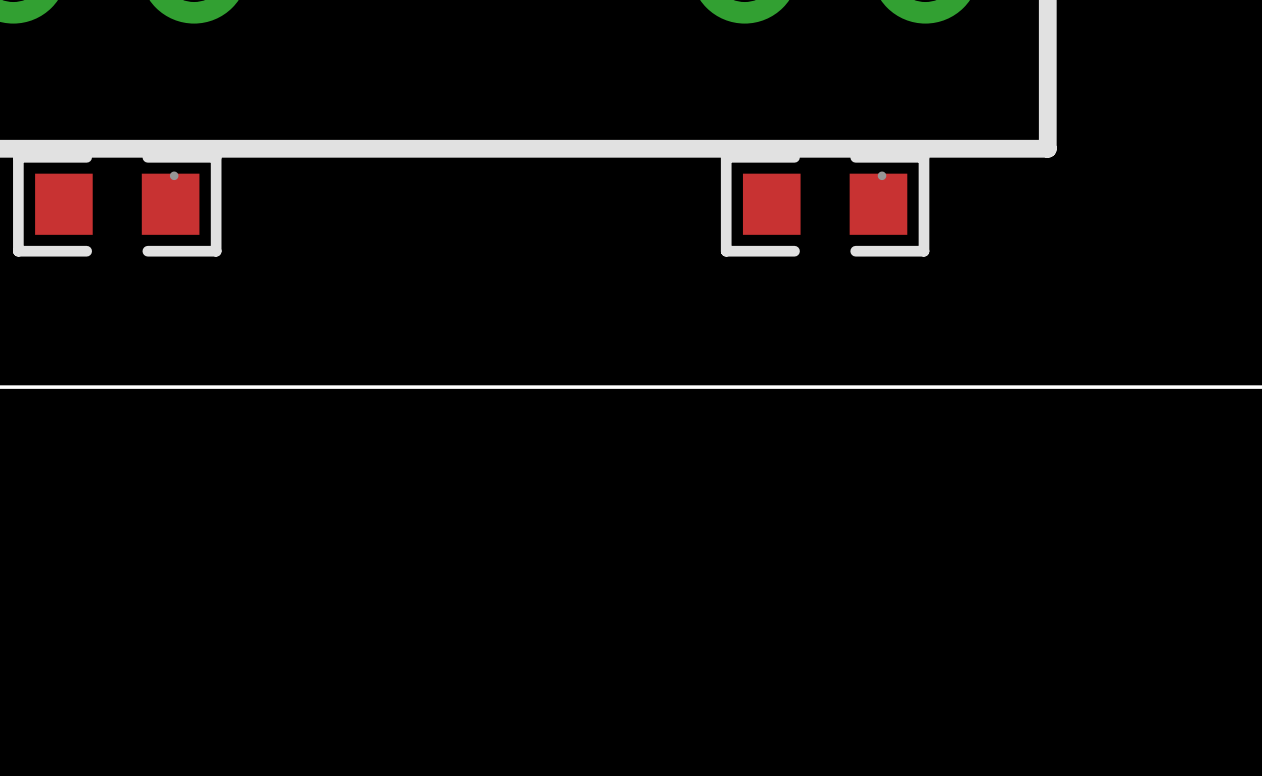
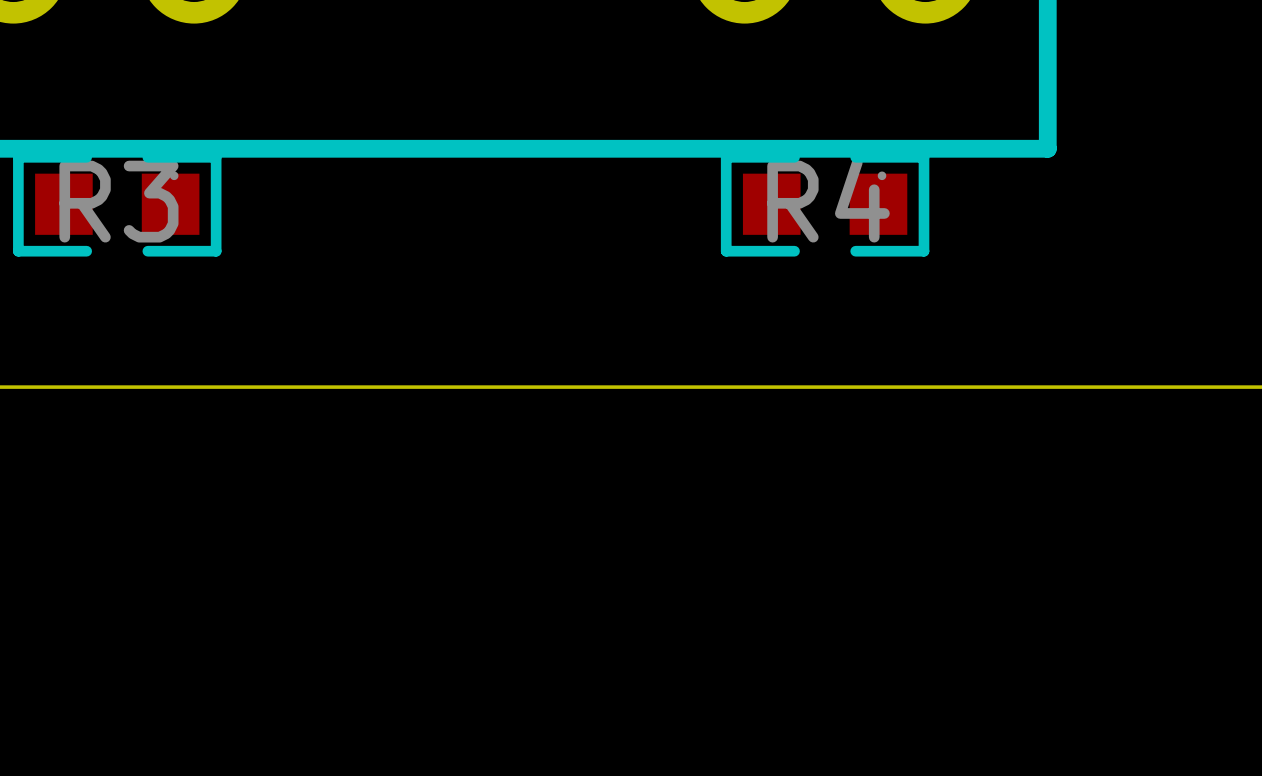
R4 name: none -> R4 (828, 199)
R3 name: none -> R3 (118, 201)

